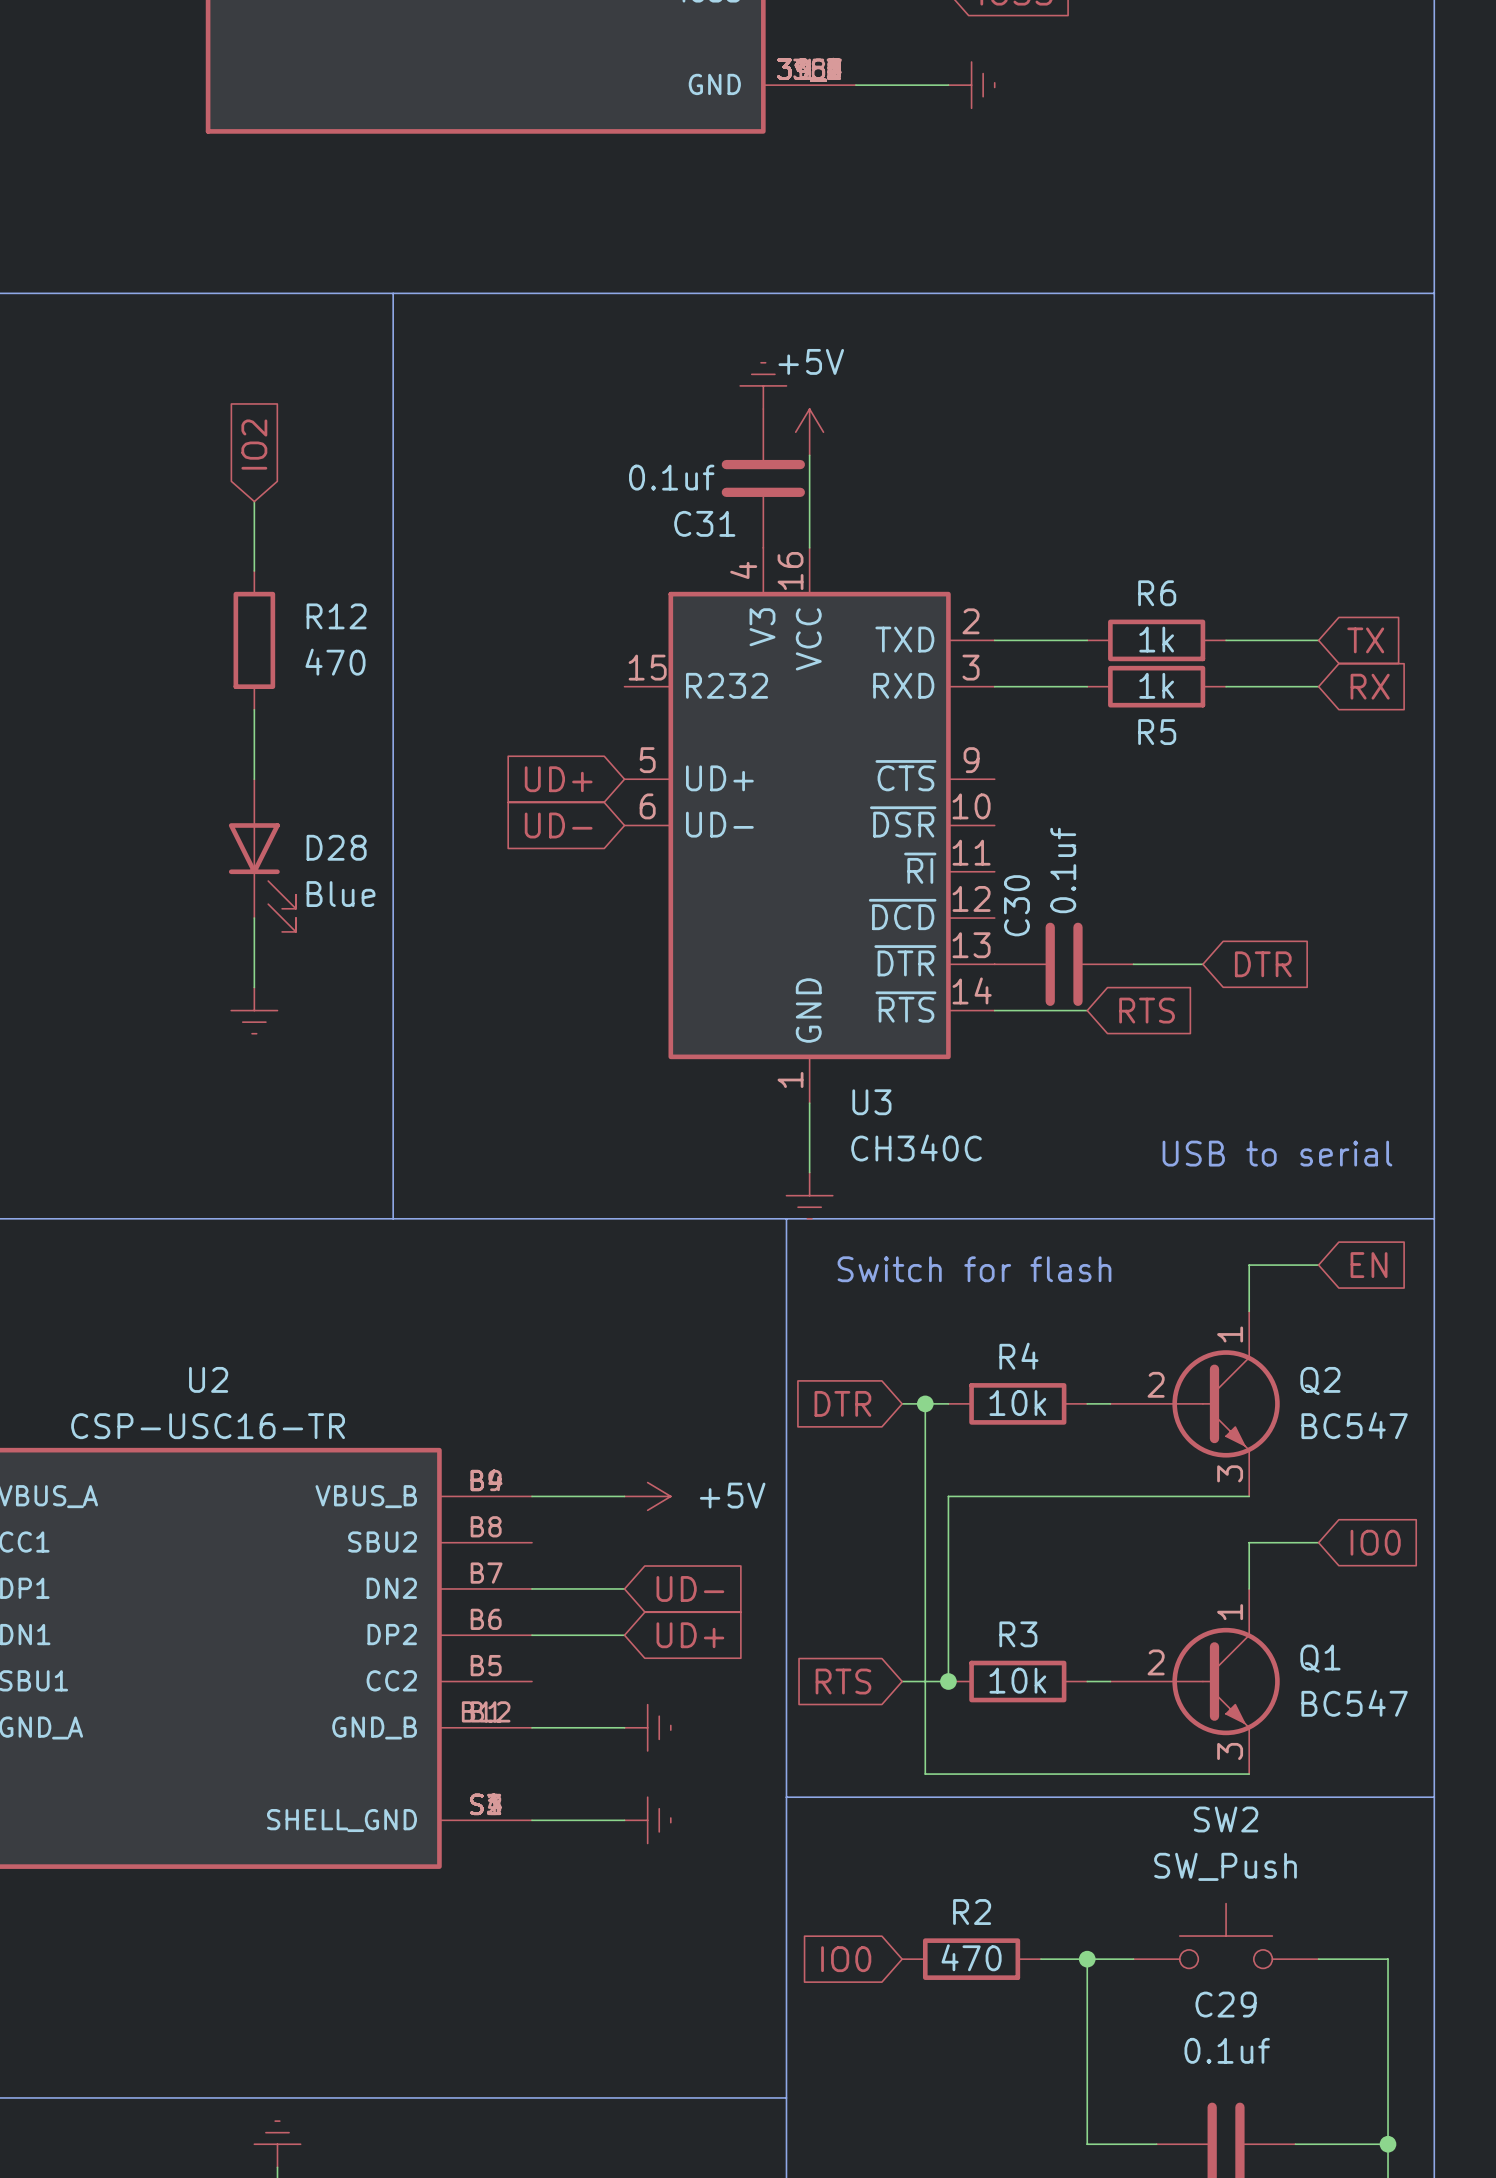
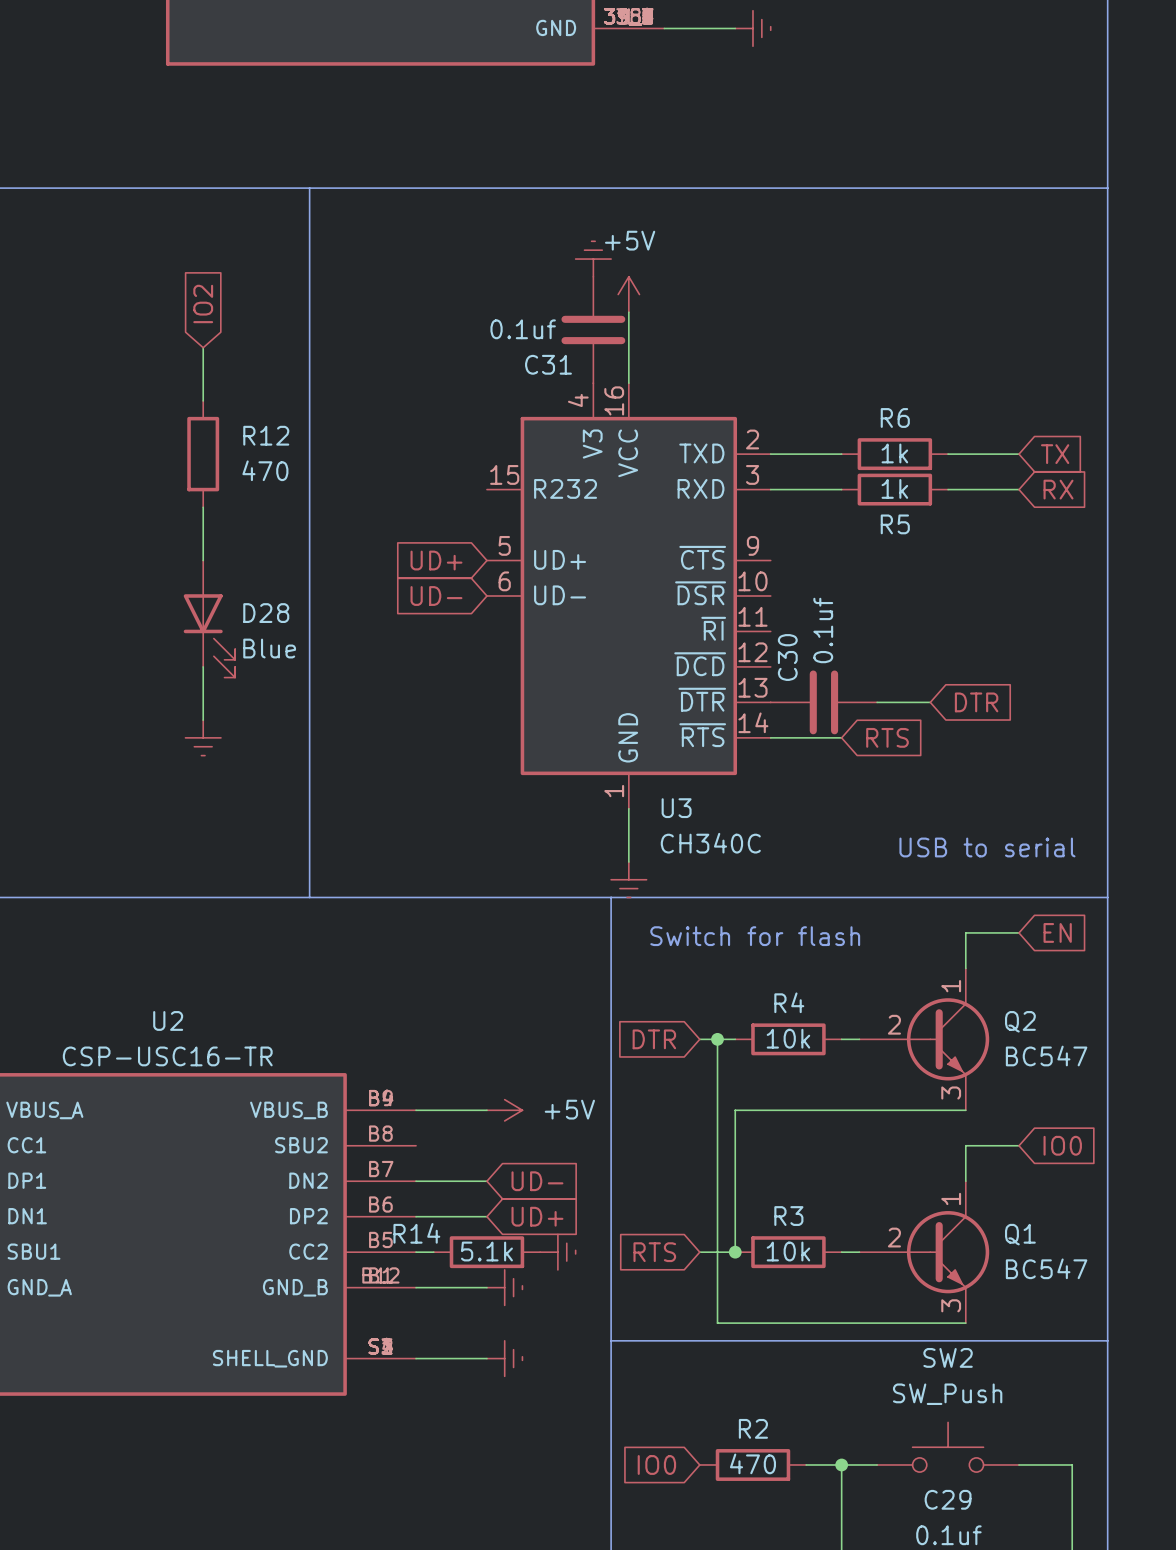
wire: none -> (416, 1252) (433, 1252)
R14: none -> 5.1k (486, 1252)
power symbol: none -> (557, 1252)

